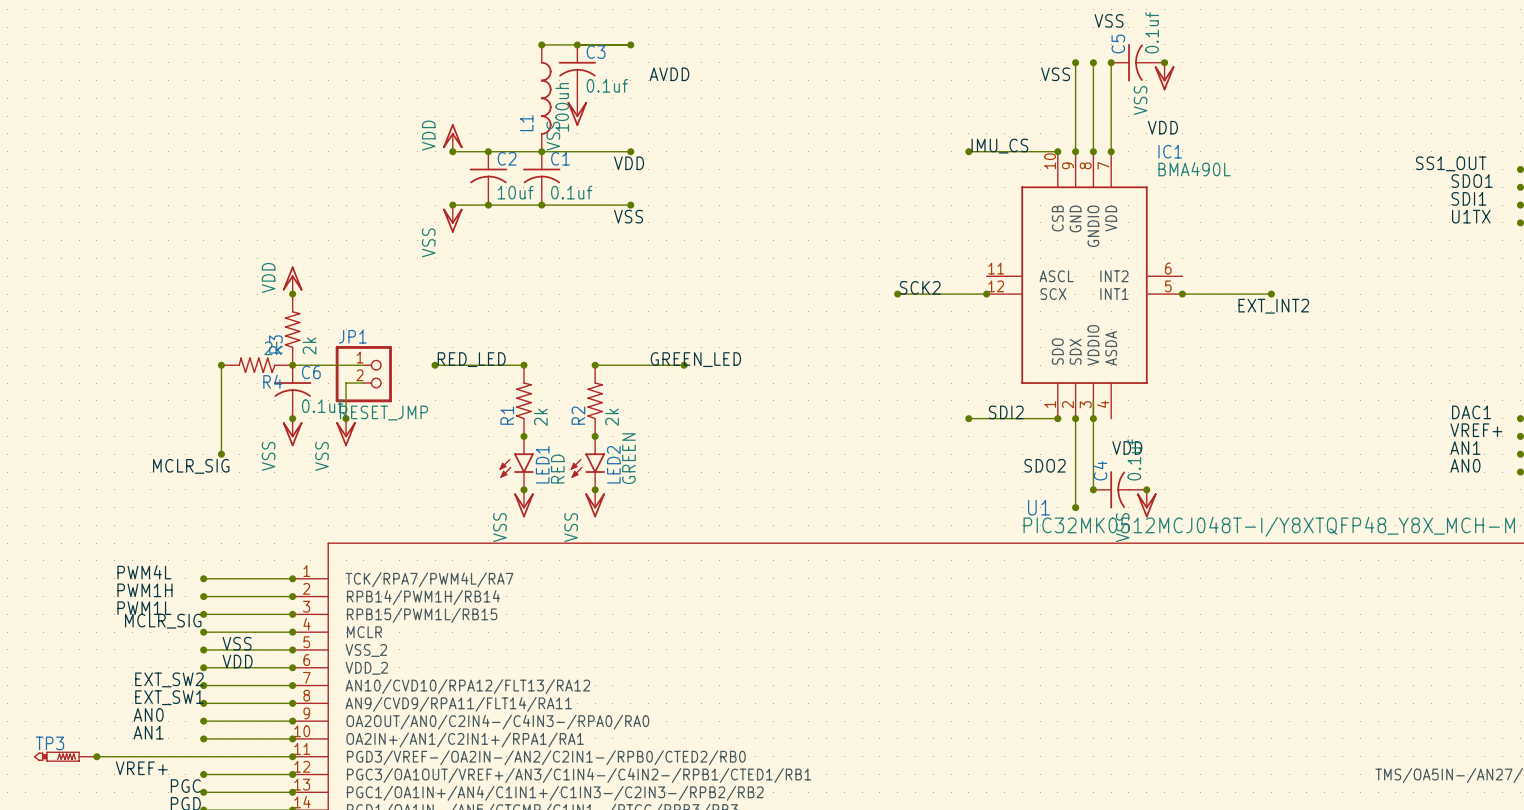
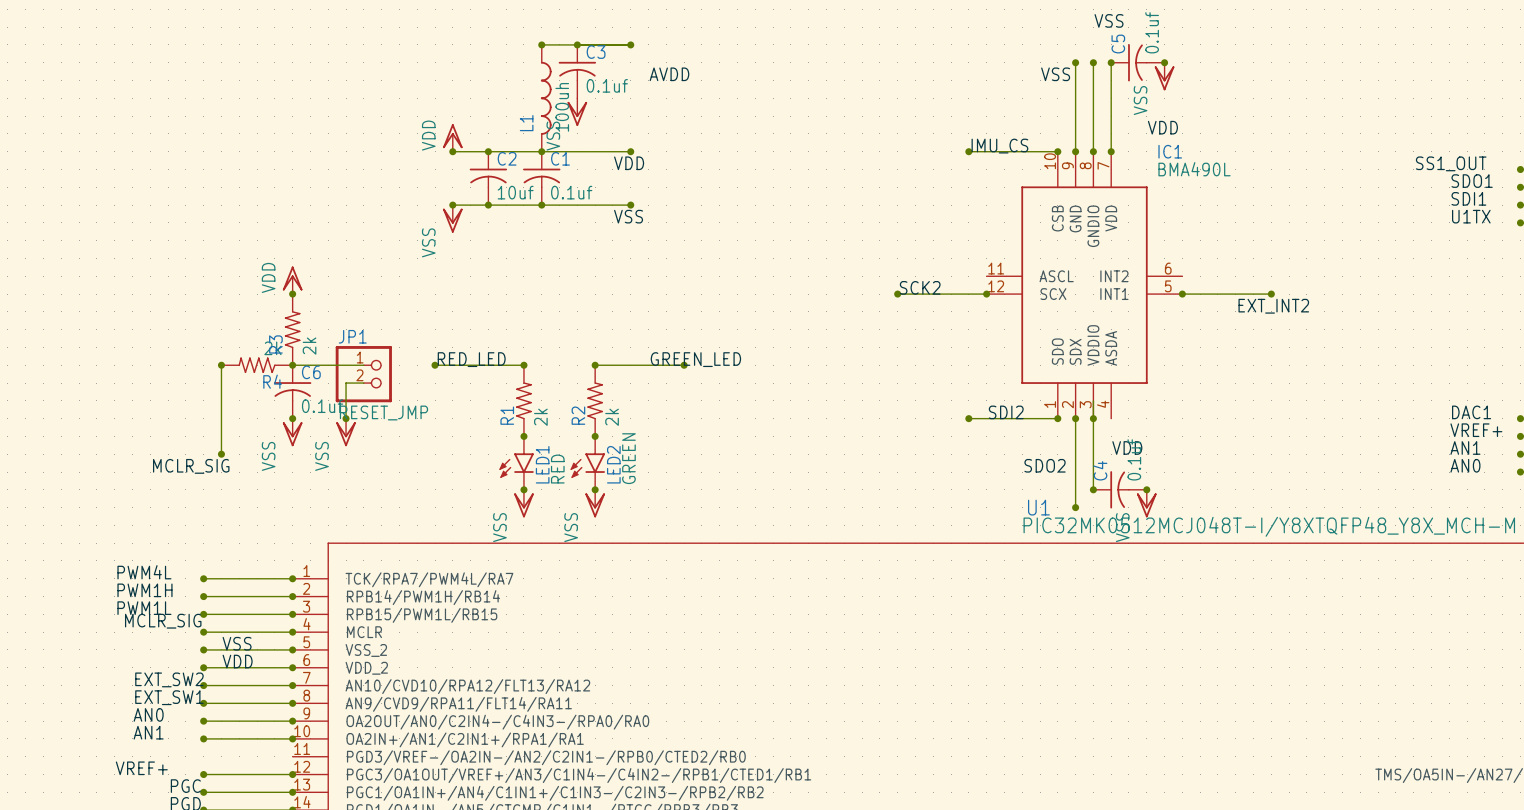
TP3: (65, 756) -> none
wire: (96, 756) (292, 756) -> none
junction: (96, 756) -> none
junction: (292, 756) -> none

